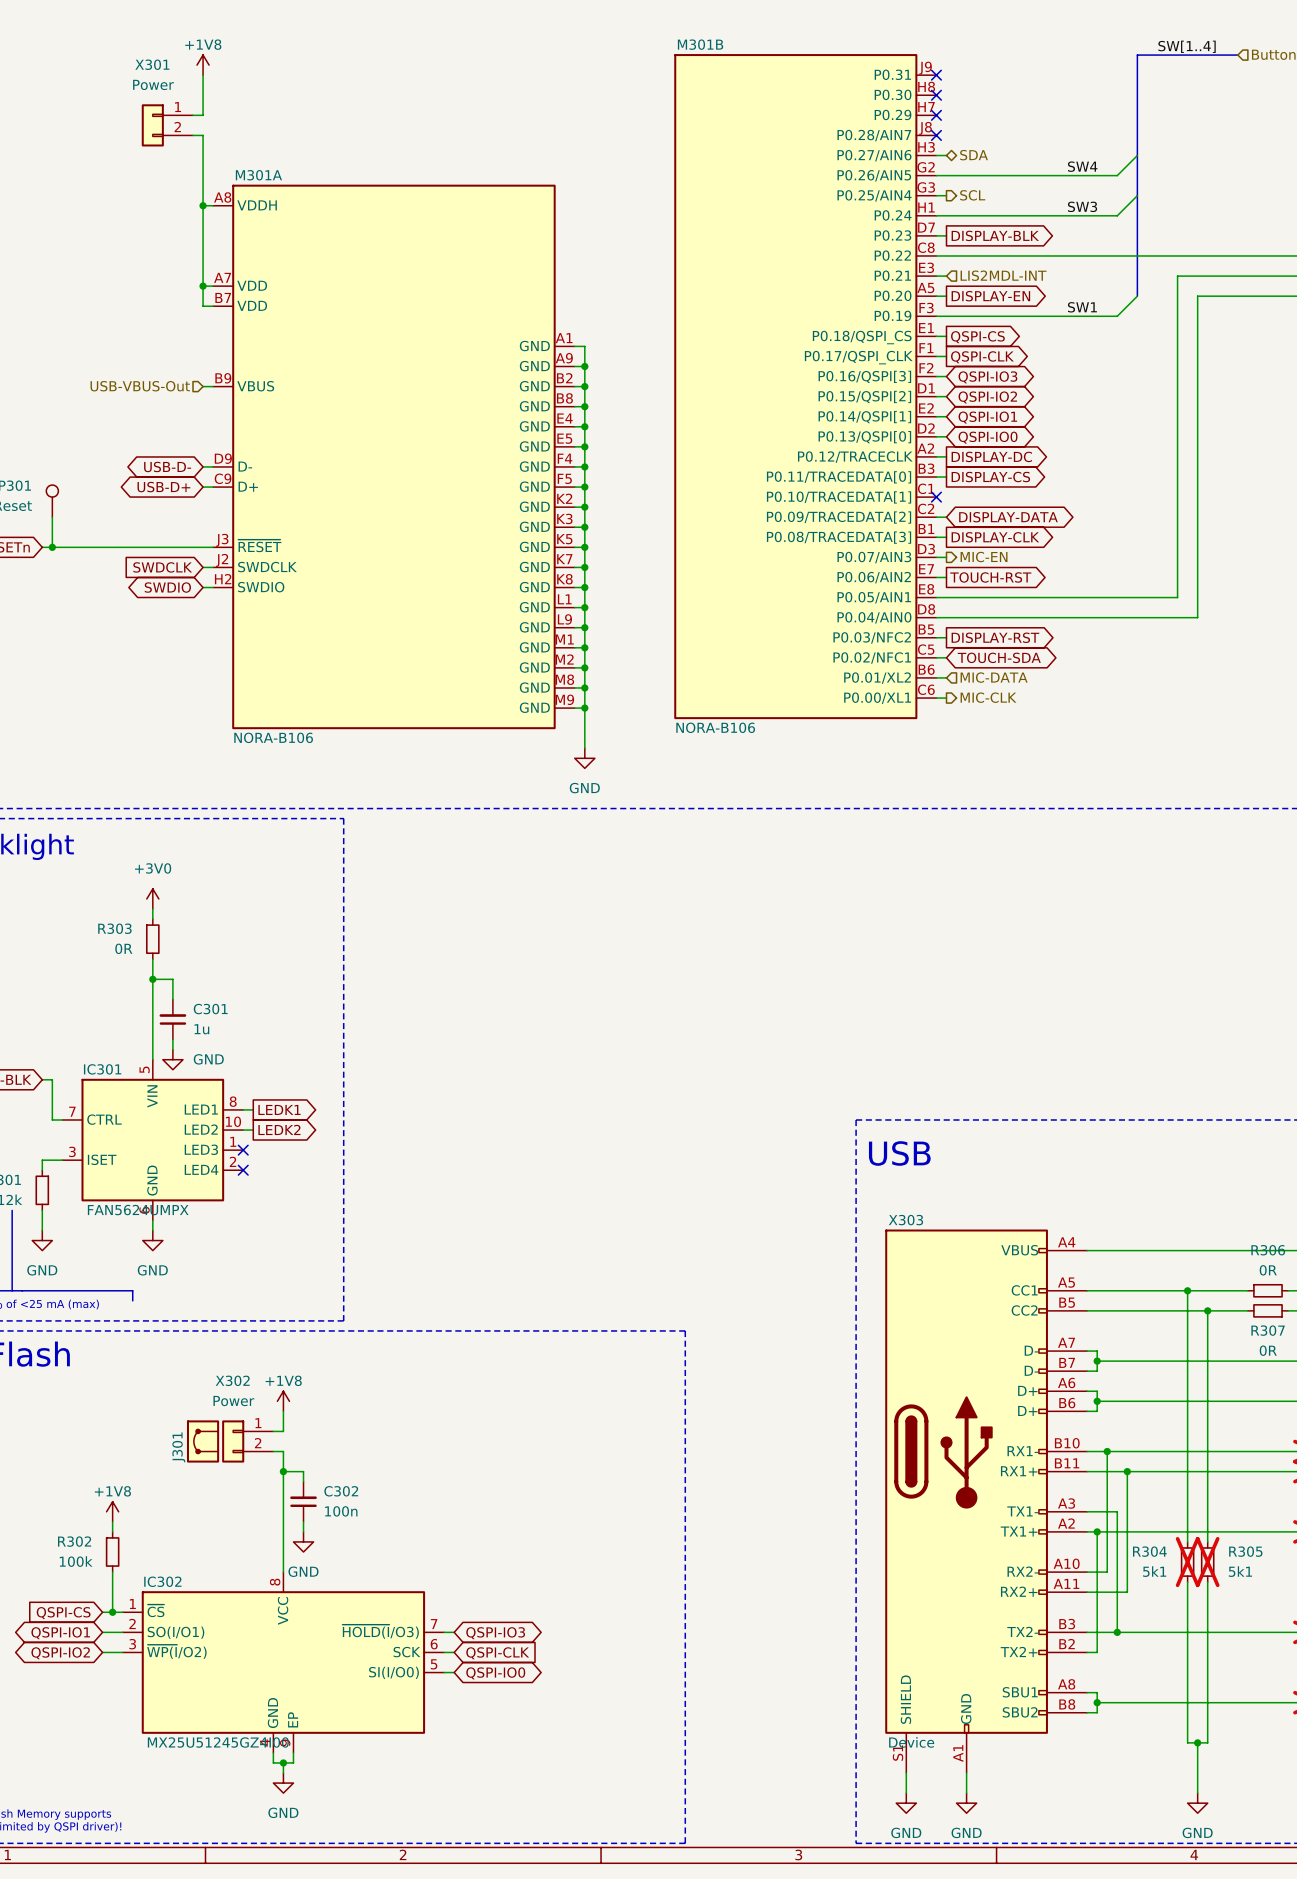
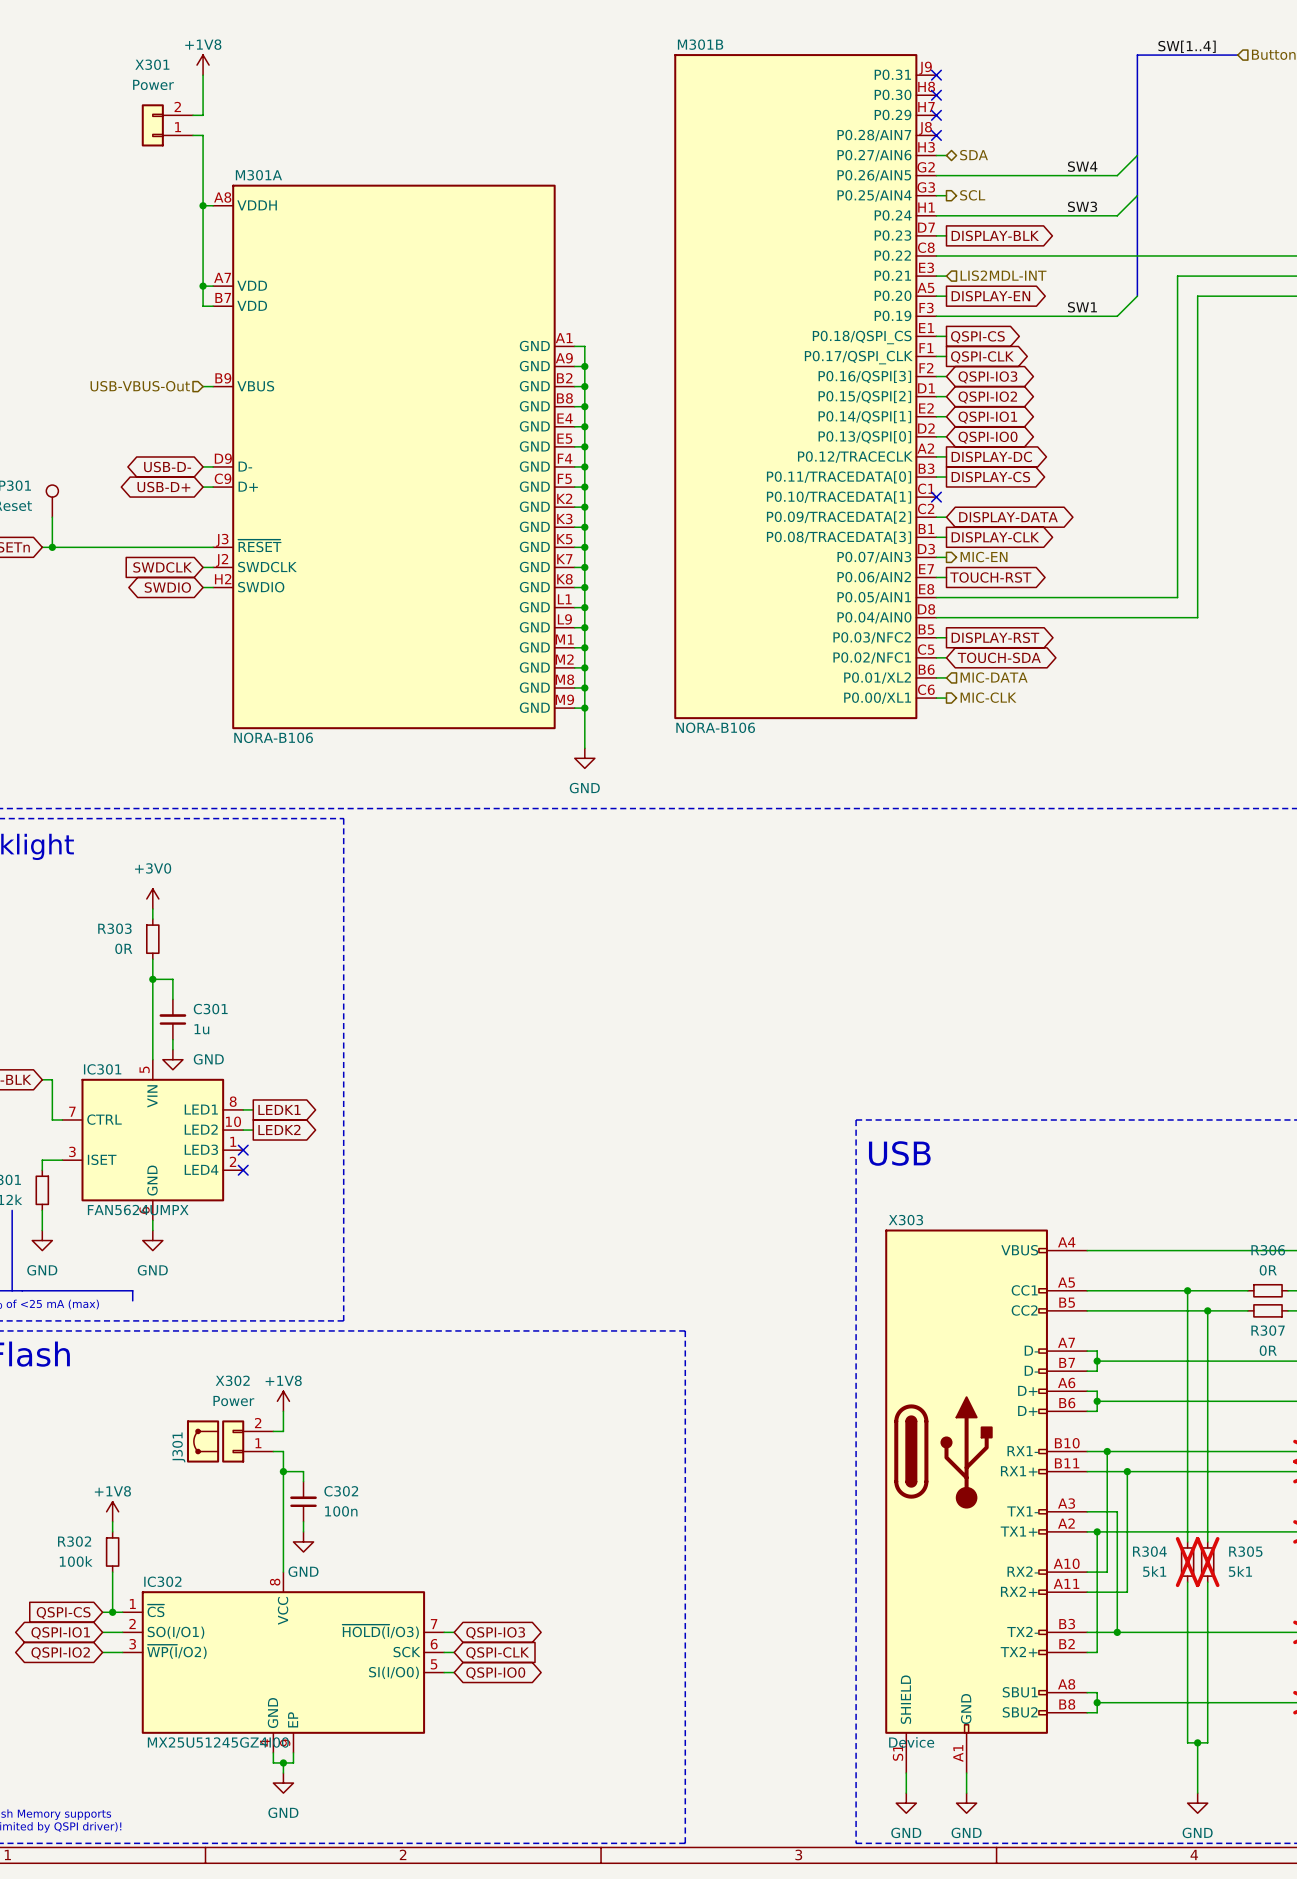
X301 flip: as is (152, 125) -> up-down (152, 125)
X302 flip: as is (233, 1441) -> up-down (233, 1441)

